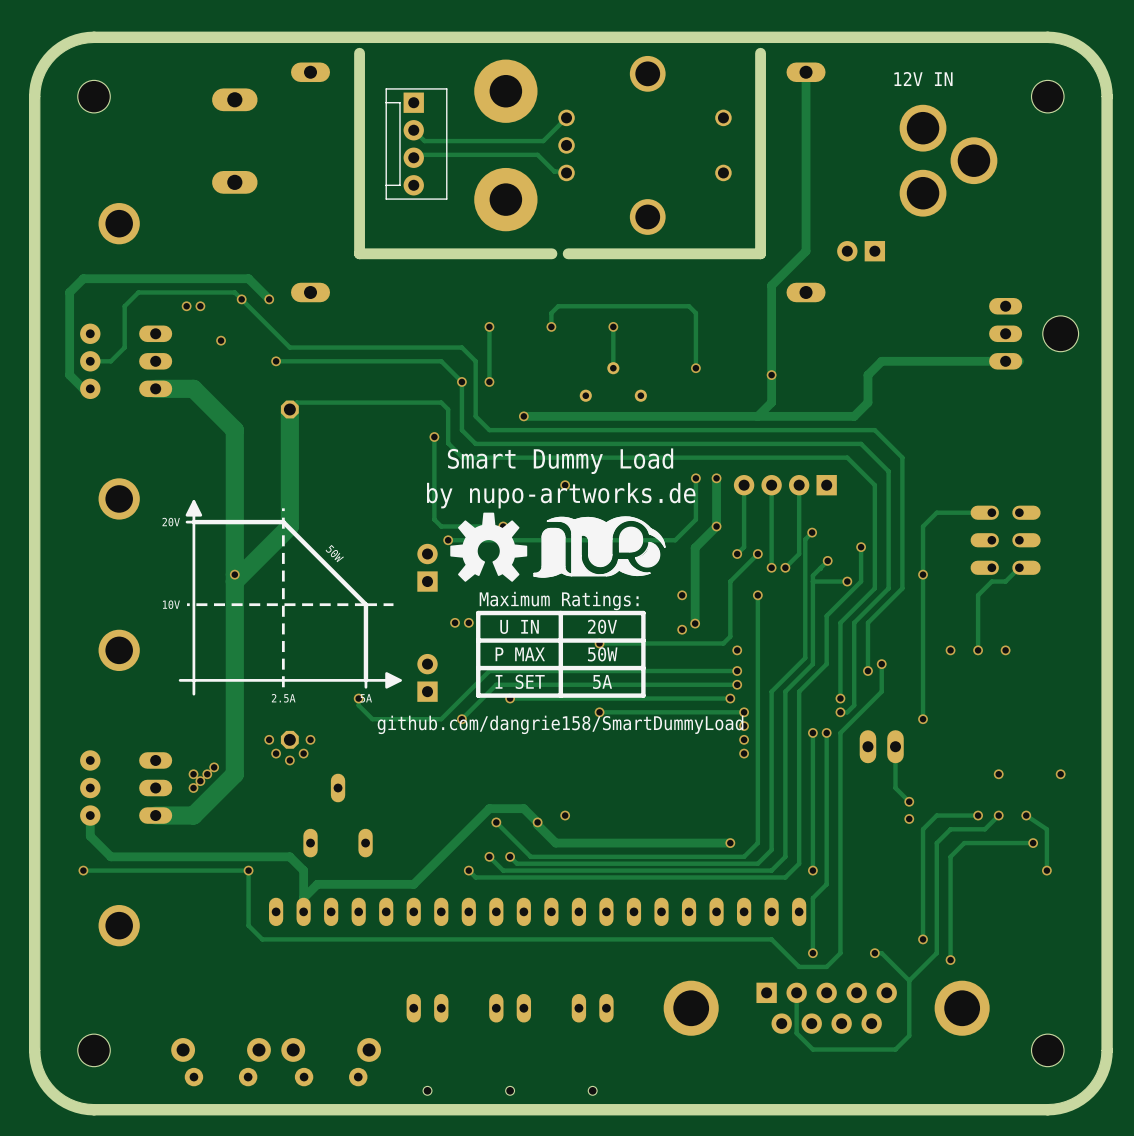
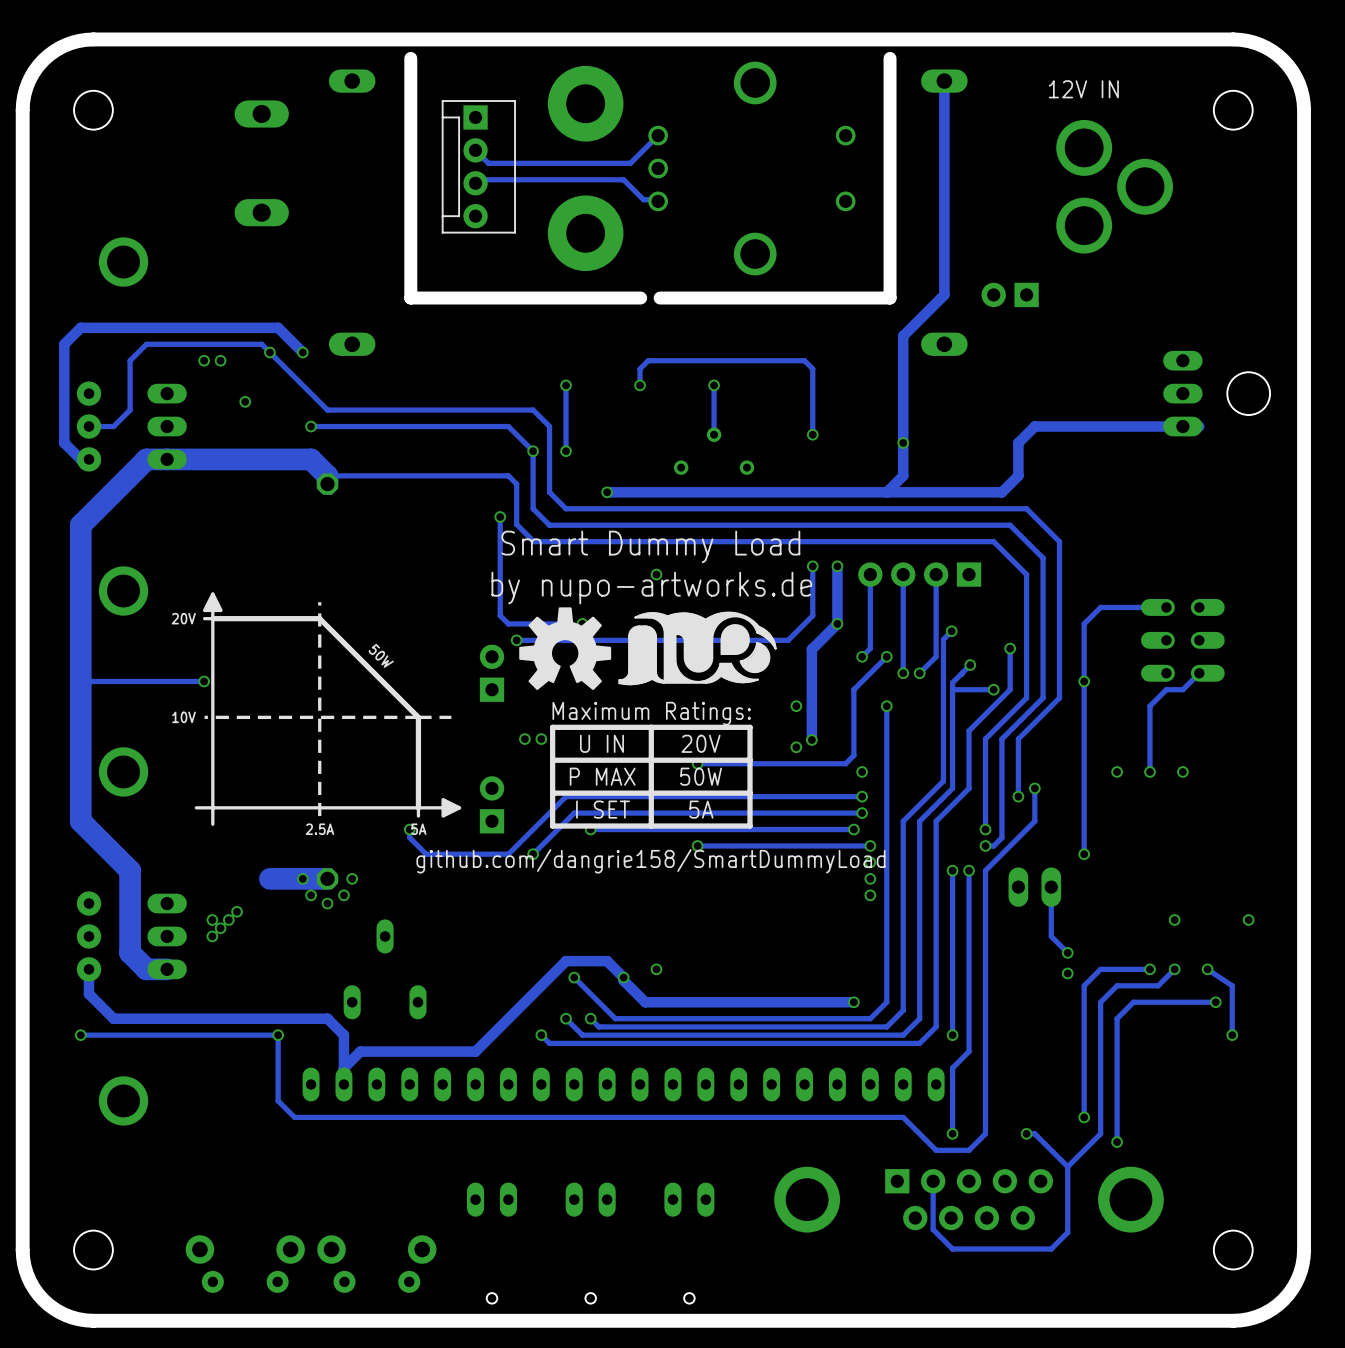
track: (193, 388) (234, 430) (234, 774) (193, 815) (155, 815) -> (167, 459) (146, 459) (80, 525) (80, 821) (130, 870) (130, 952) (146, 969) (167, 969)
track: (289, 409) (289, 526) (234, 581) -> (327, 484) (327, 475) (311, 459) (212, 459)
track: none -> (204, 681) (80, 681)
via position: (234, 574) -> (204, 681)
track: none -> (327, 878) (269, 878)

